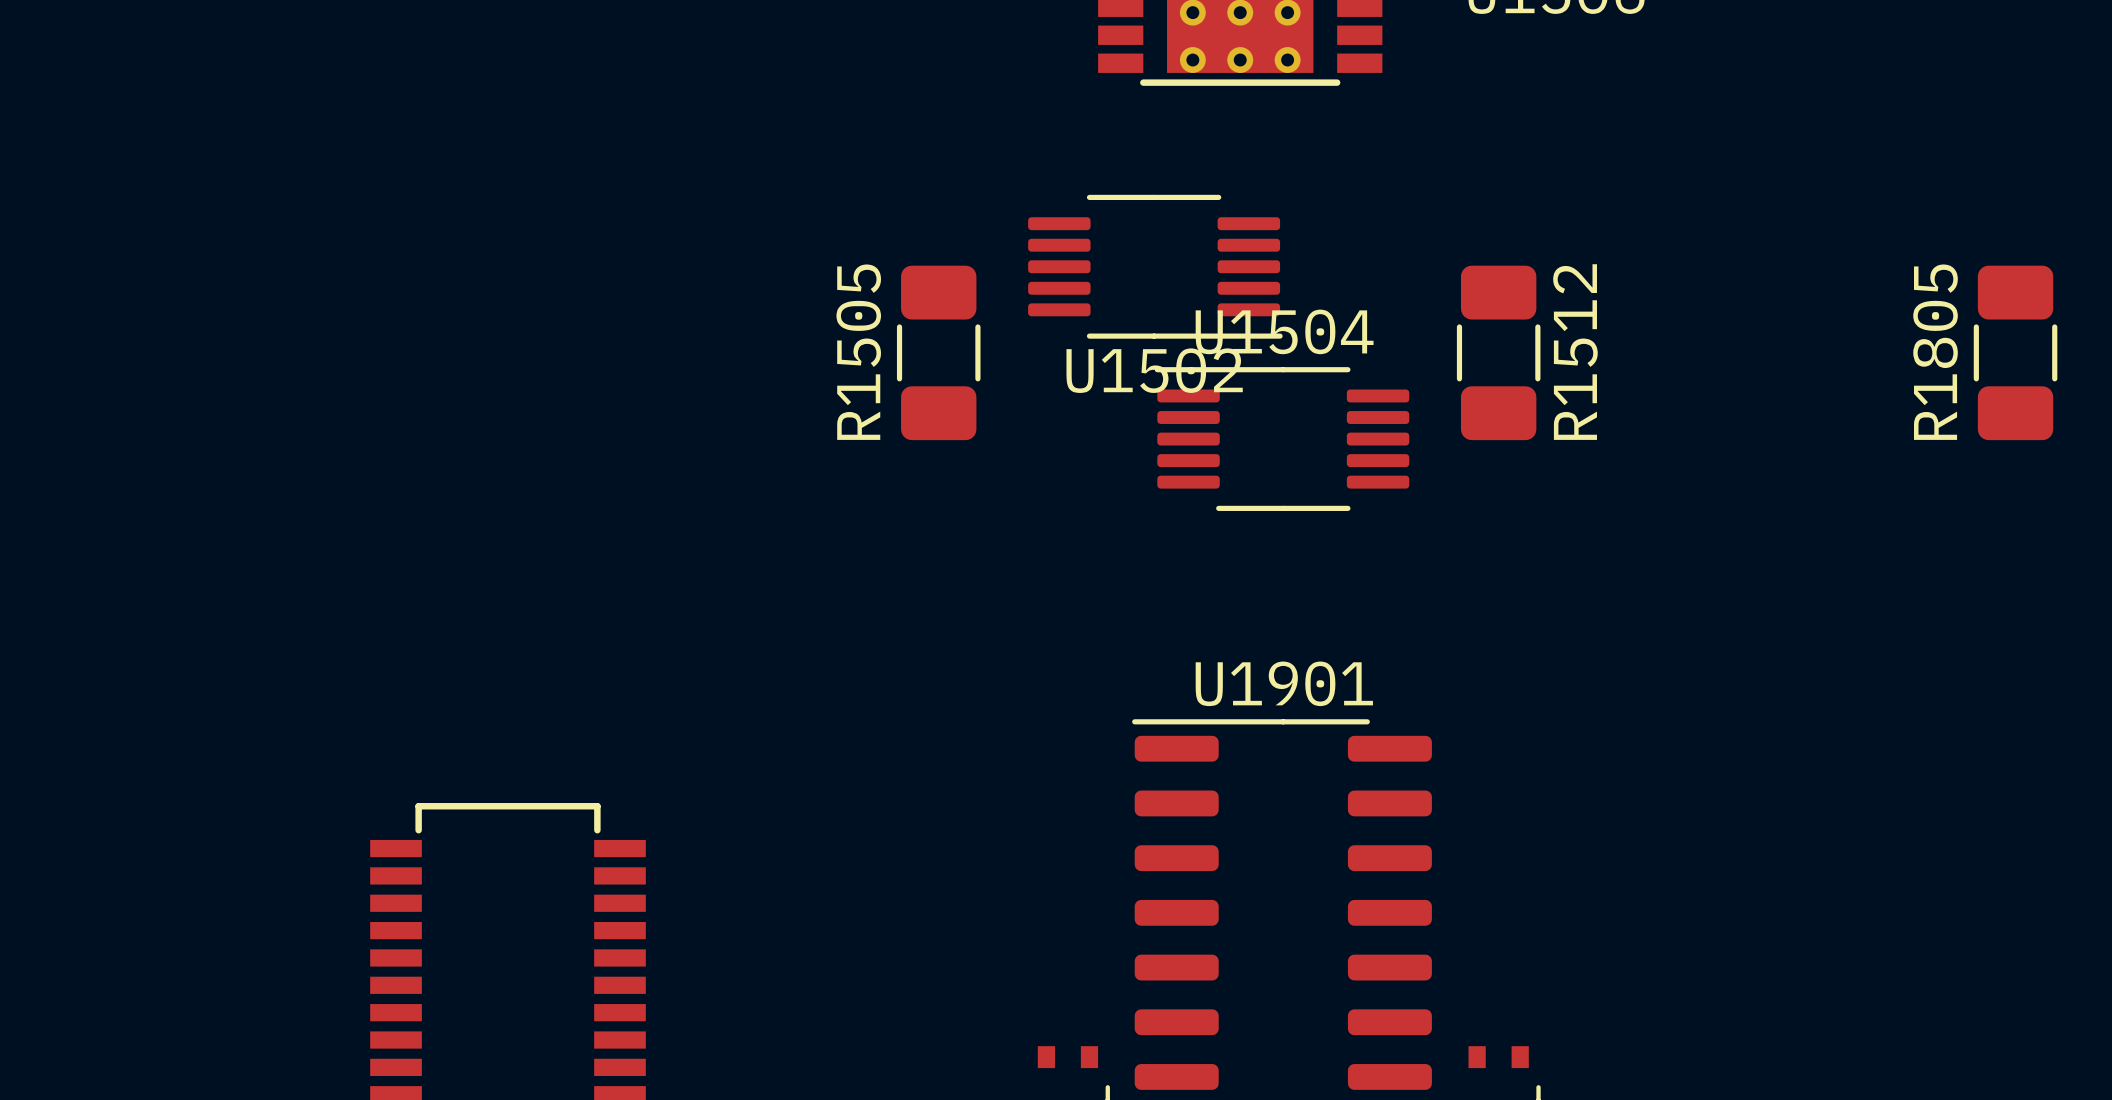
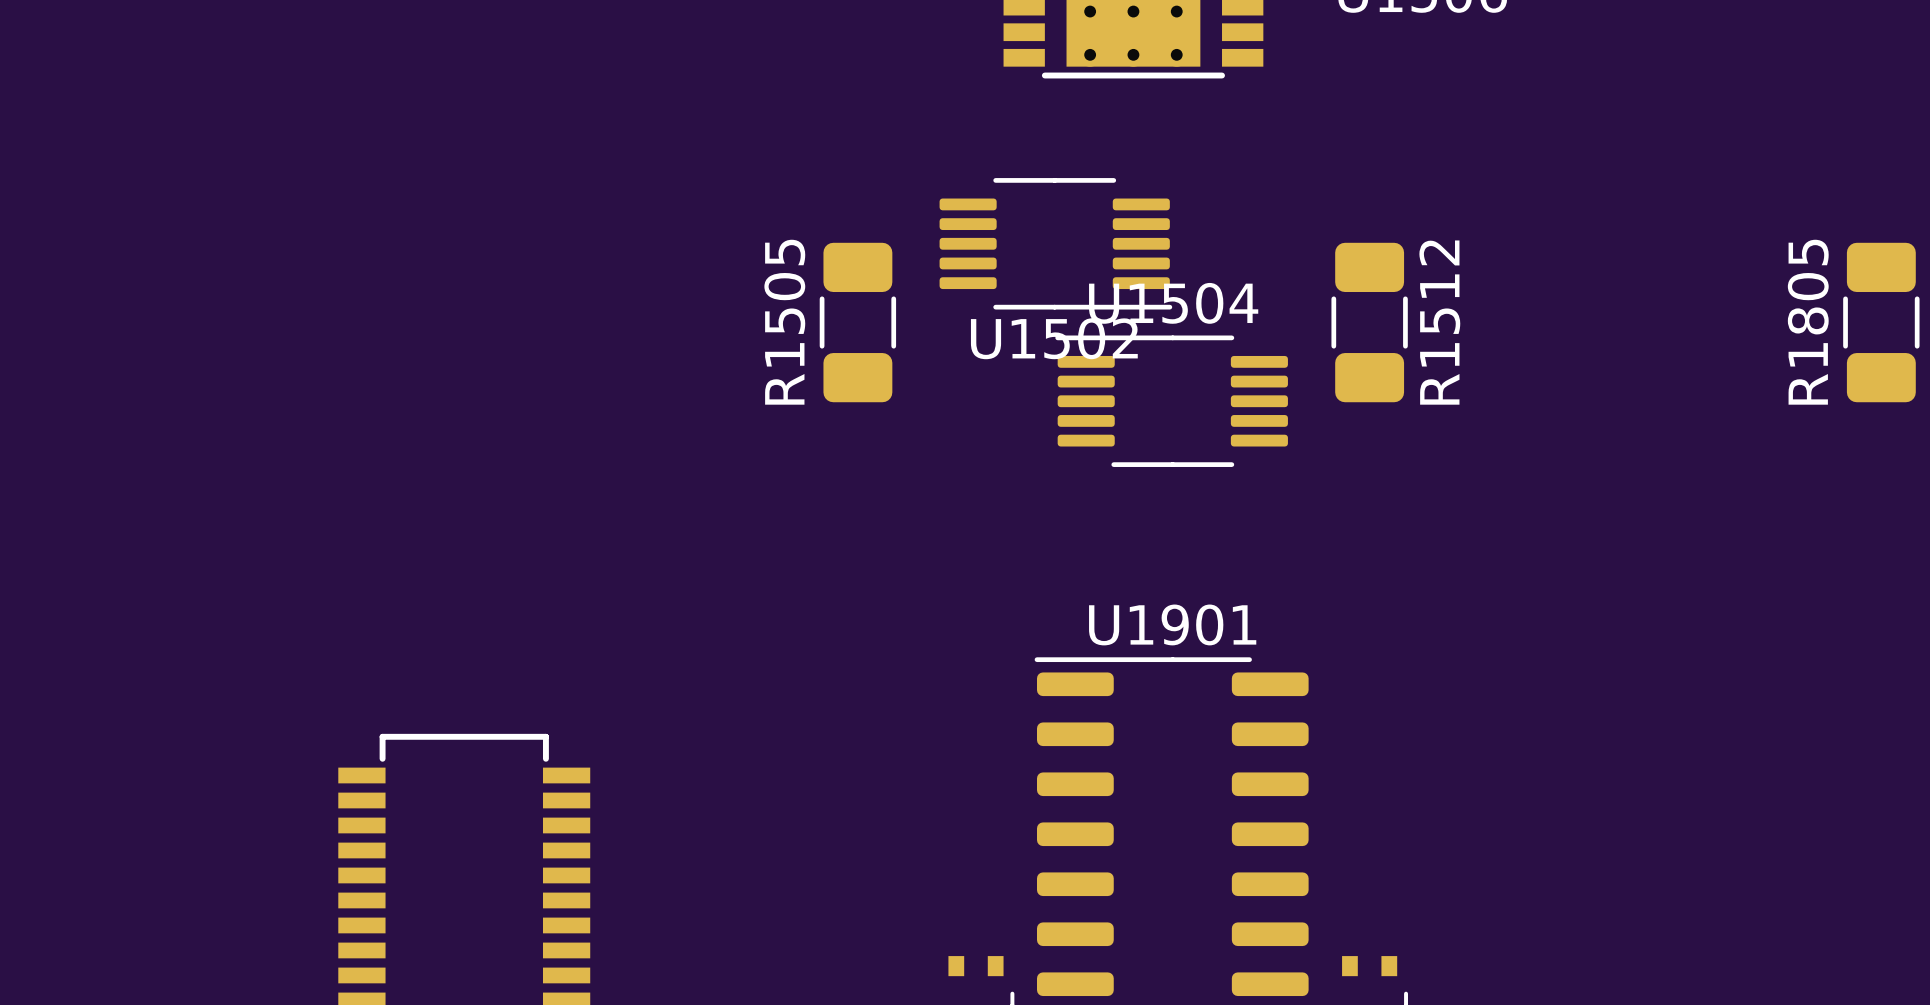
R1805 position: (2015, 352) -> (1881, 322)

